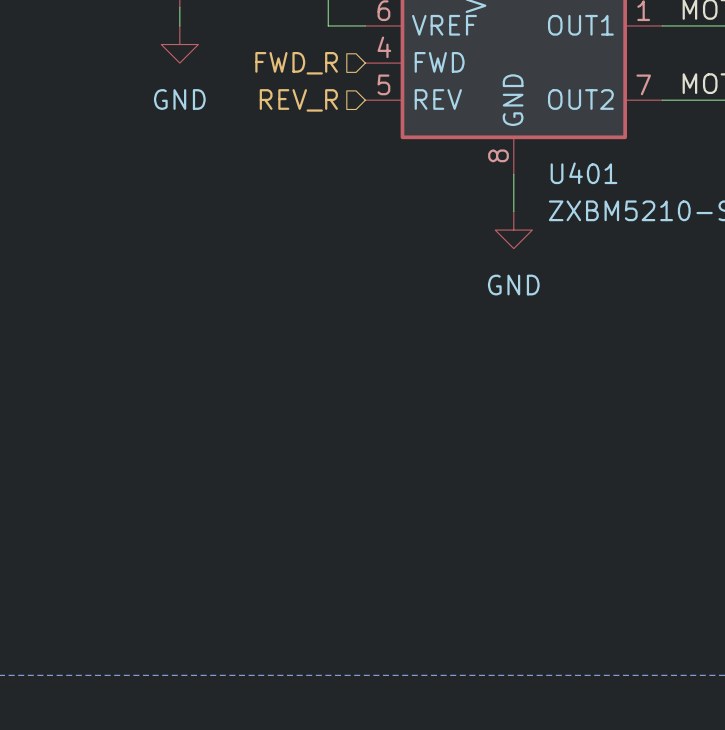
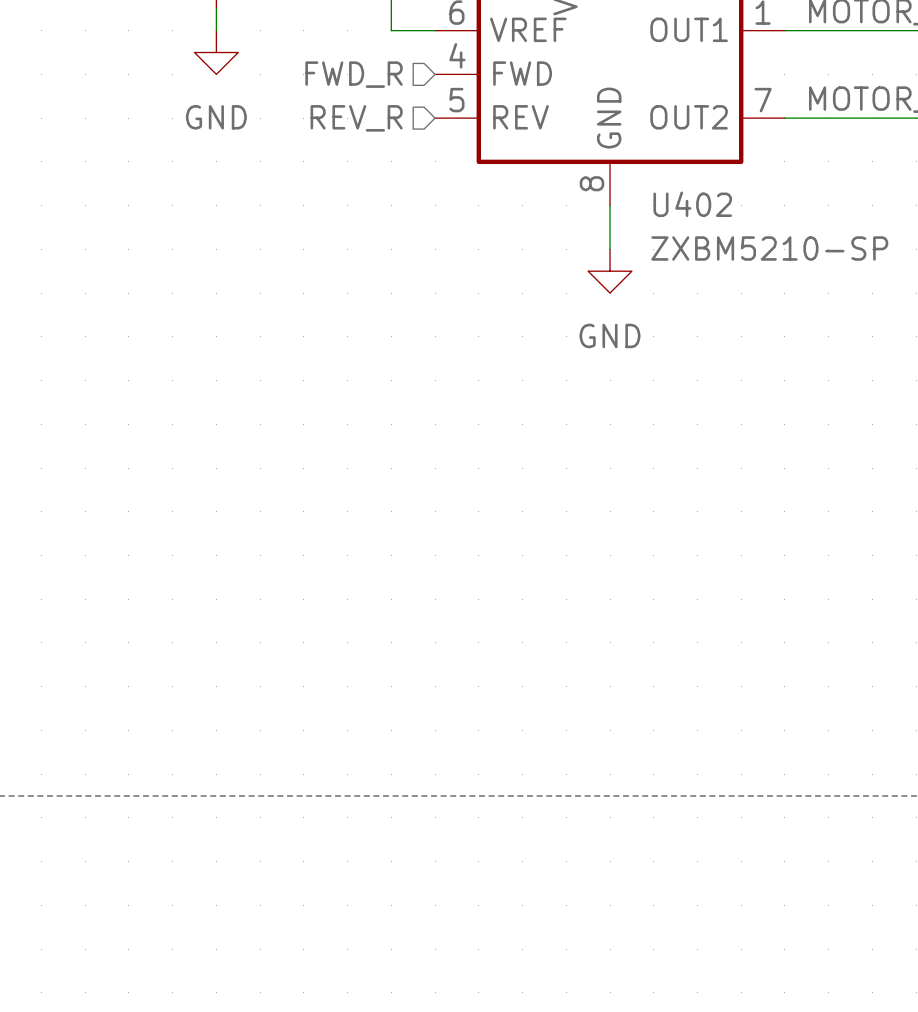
U401 name: U401 (583, 173) -> U402 (692, 204)

